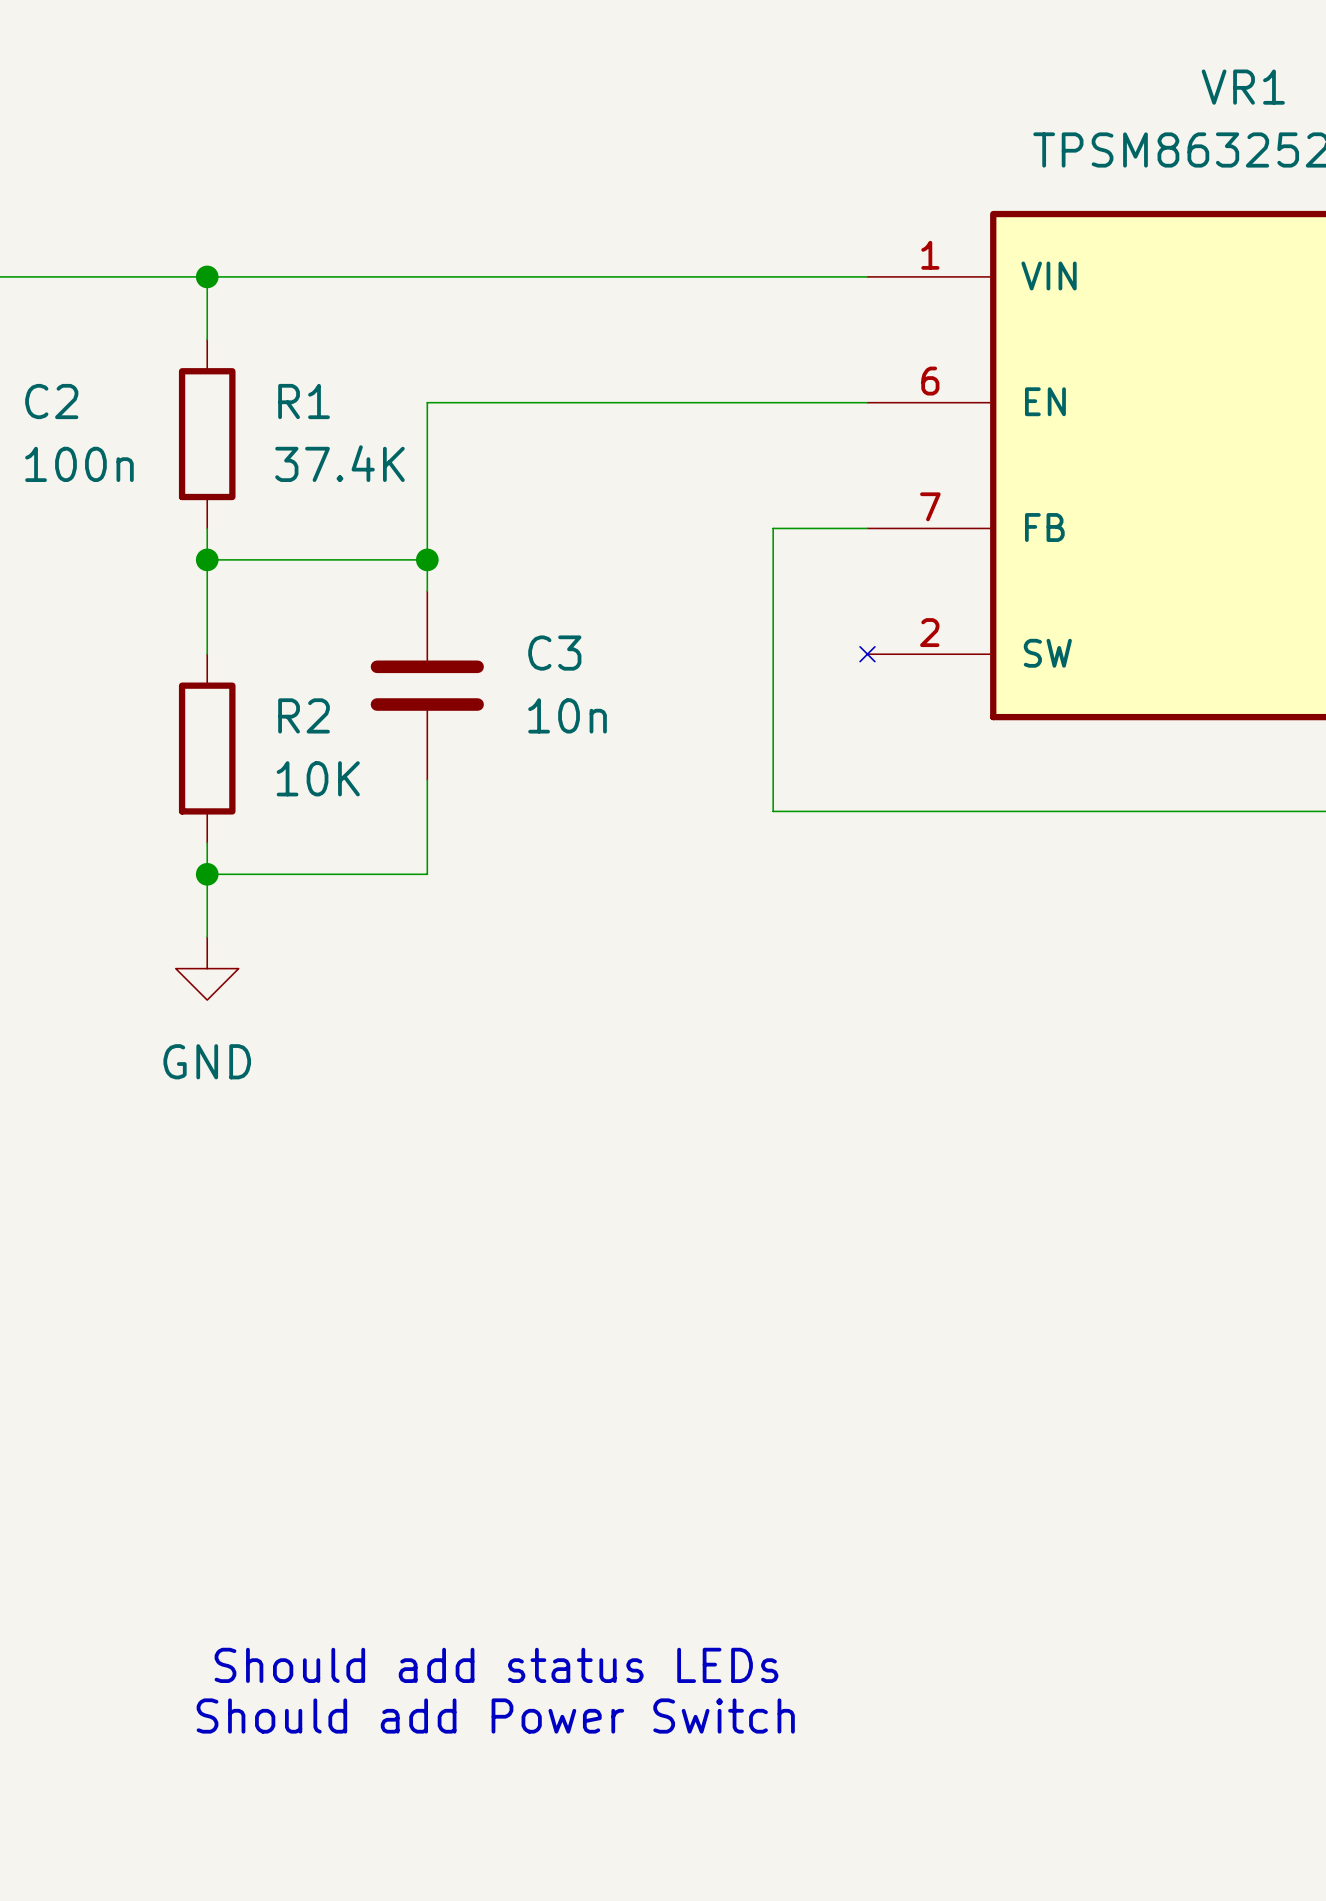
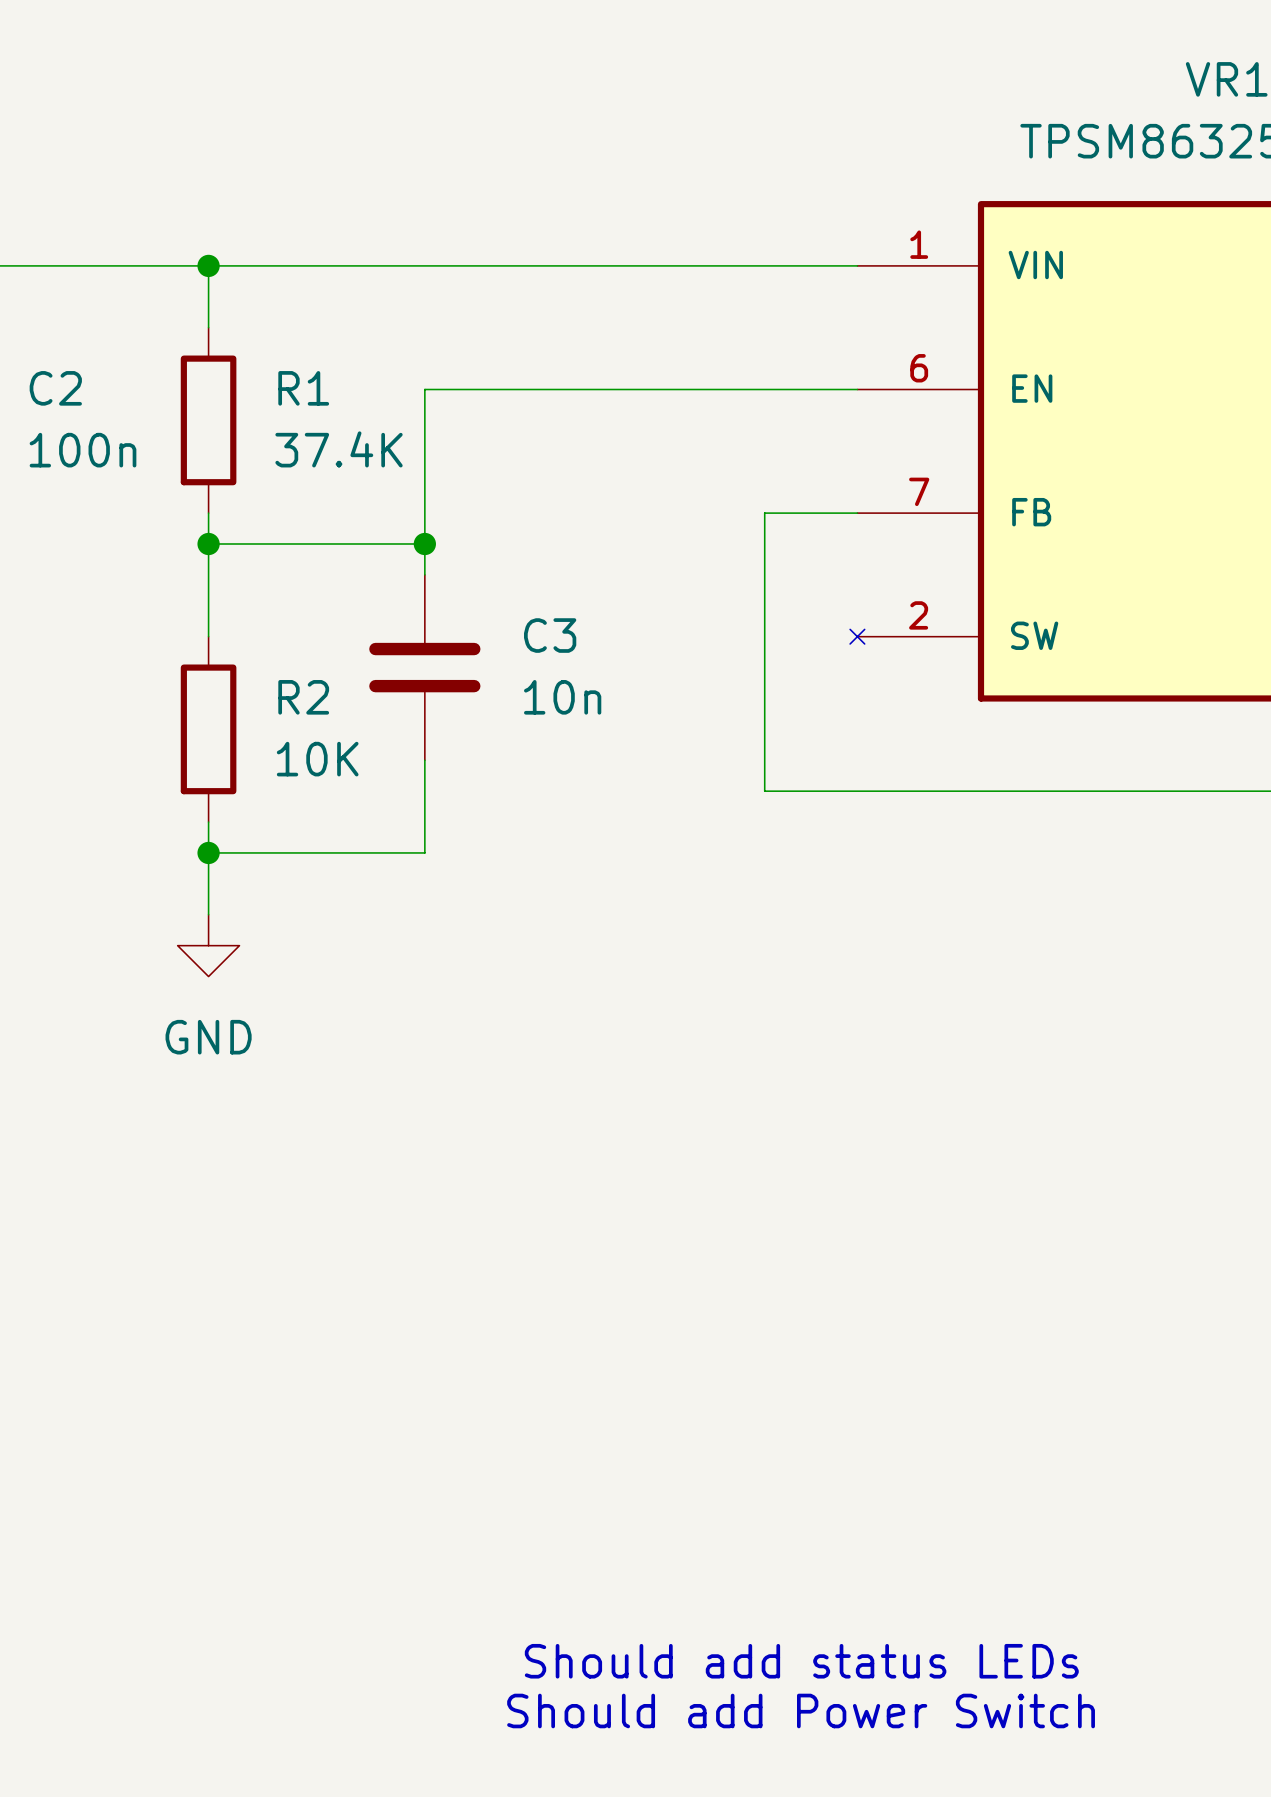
text position: Should add status LEDs (496, 1665) -> Should add status LEDs (801, 1661)
text position: Should add Power Switch (495, 1716) -> Should add Power Switch (801, 1710)

